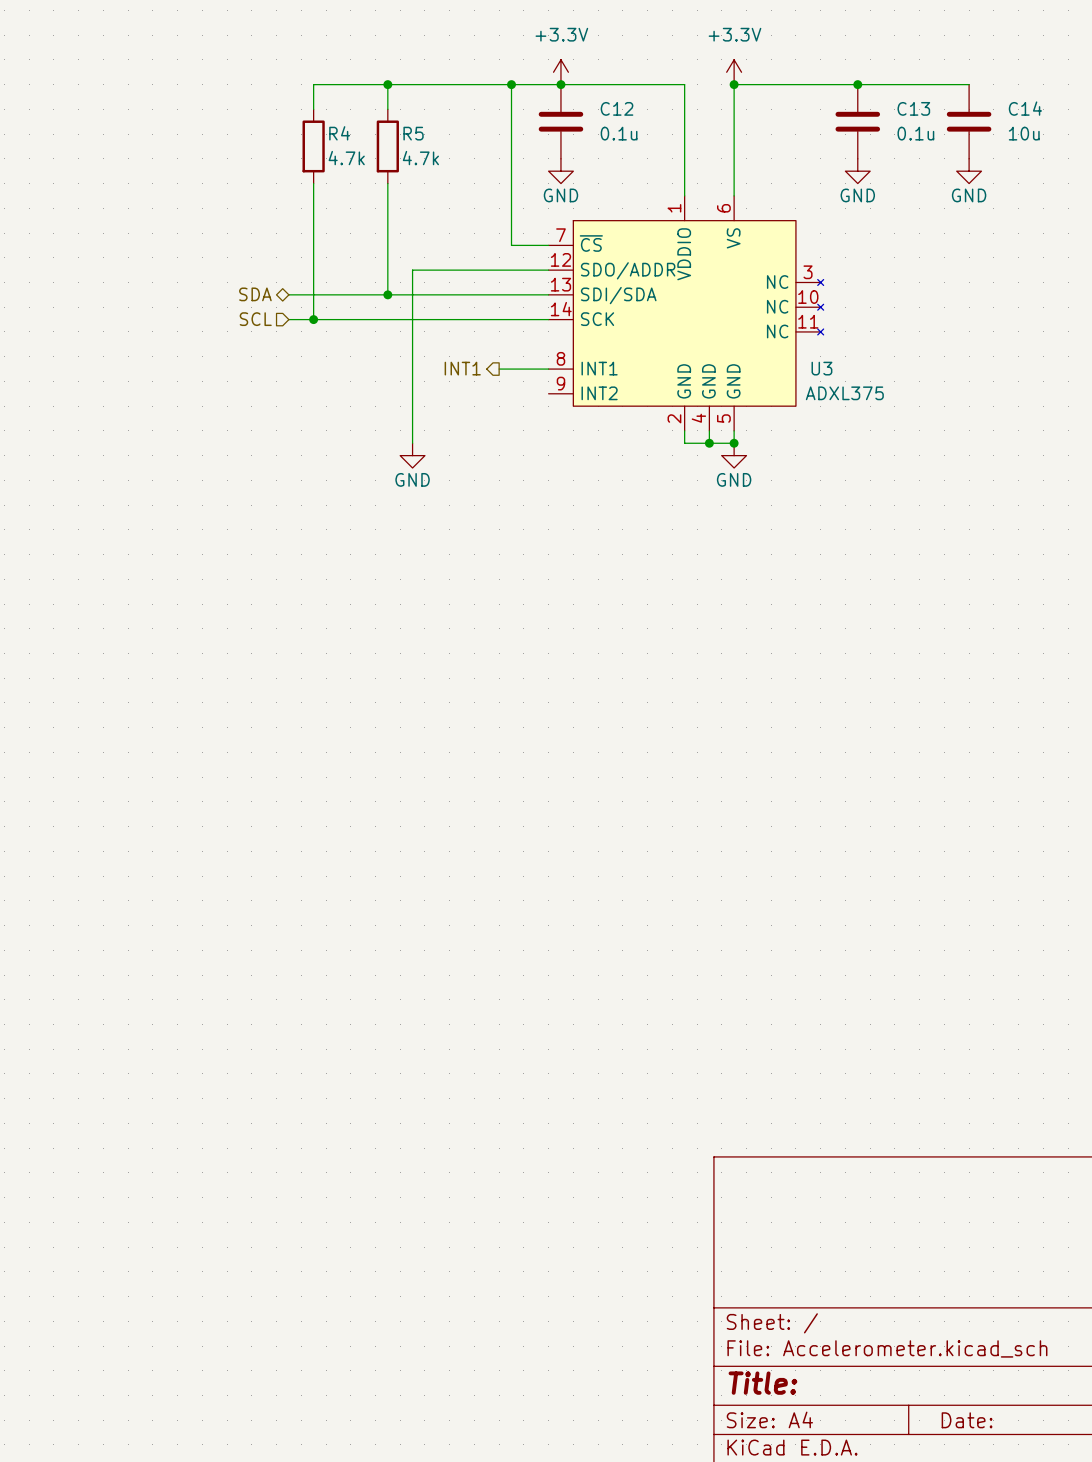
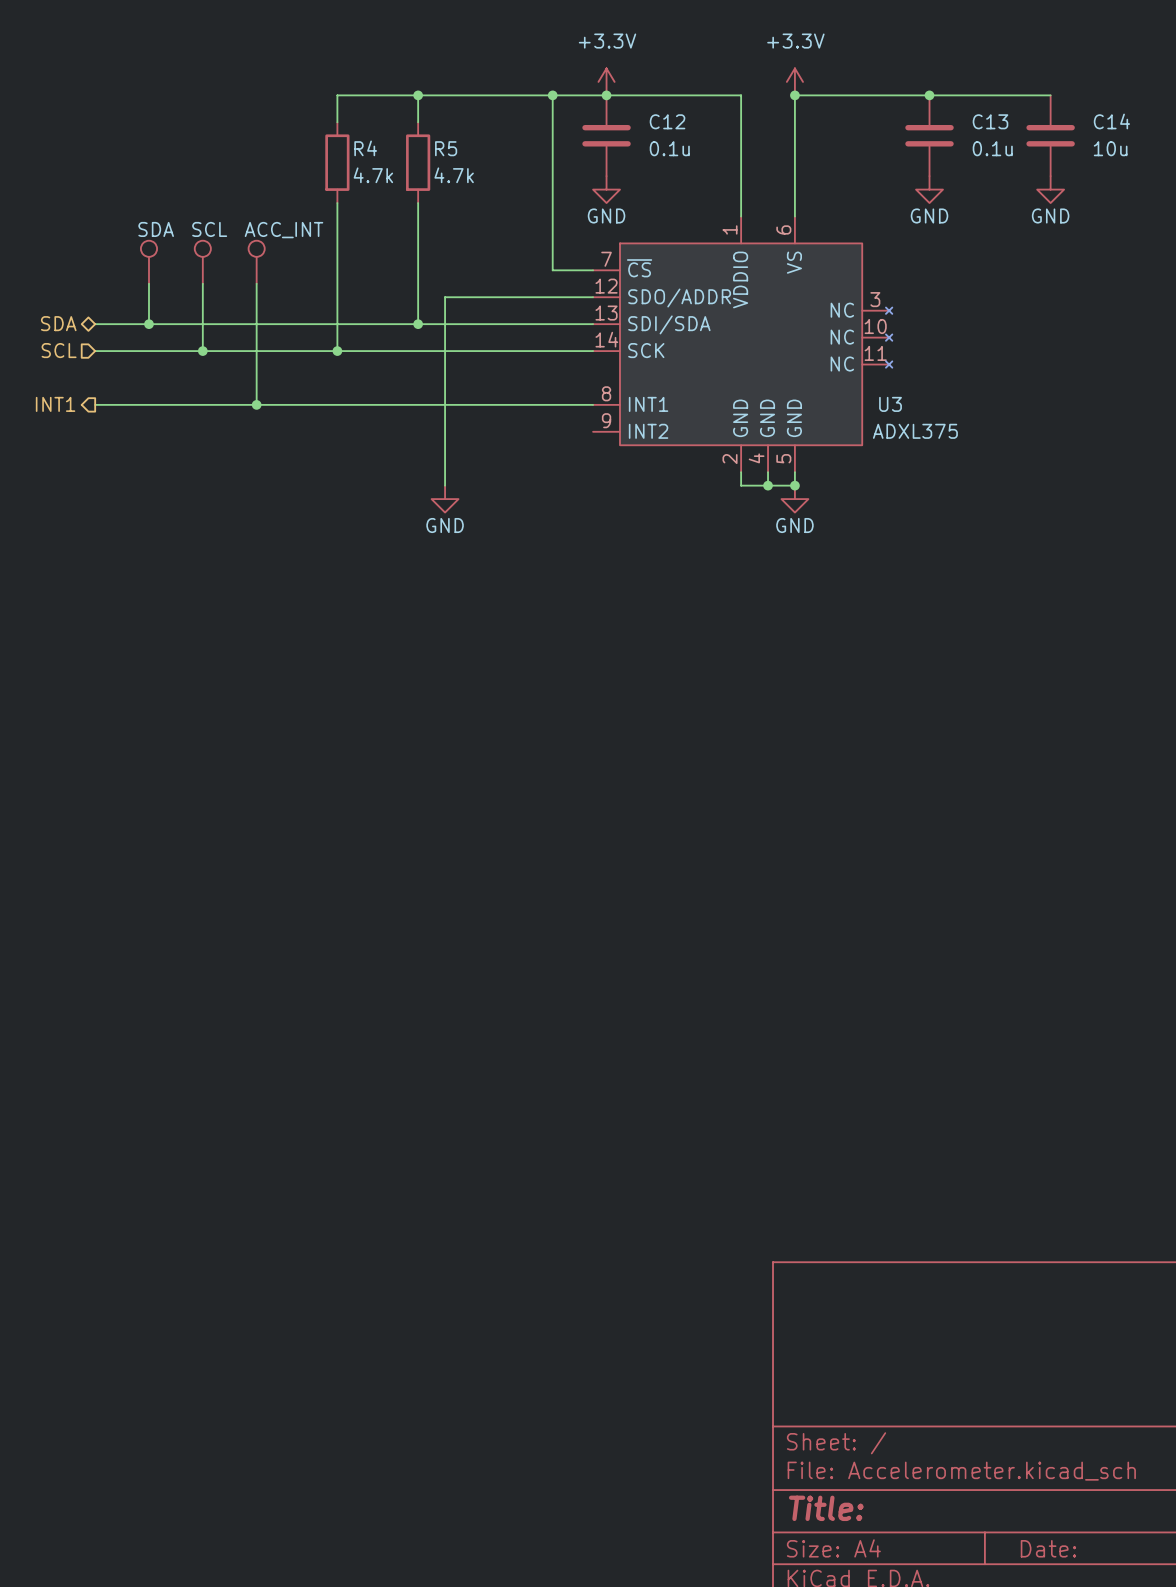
part: none -> SDA (148, 262)
part: none -> SCL (202, 262)
part: none -> ACC_INT (256, 262)
wire: none -> (148, 283) (148, 324)
wire: none -> (202, 283) (202, 351)
wire: none -> (256, 283) (256, 404)
wire: none -> (95, 324) (310, 324)
junction: none -> (148, 324)
hierarchical label position: SDA (255, 294) -> SDA (58, 323)
wire: none -> (95, 351) (310, 351)
junction: none -> (202, 351)
hierarchical label position: SCL (255, 319) -> SCL (59, 350)
hierarchical label: none -> INT1 (55, 404)
hierarchical label: INT1 (462, 368) -> none
wire: none -> (95, 404) (539, 404)
junction: none -> (256, 404)

